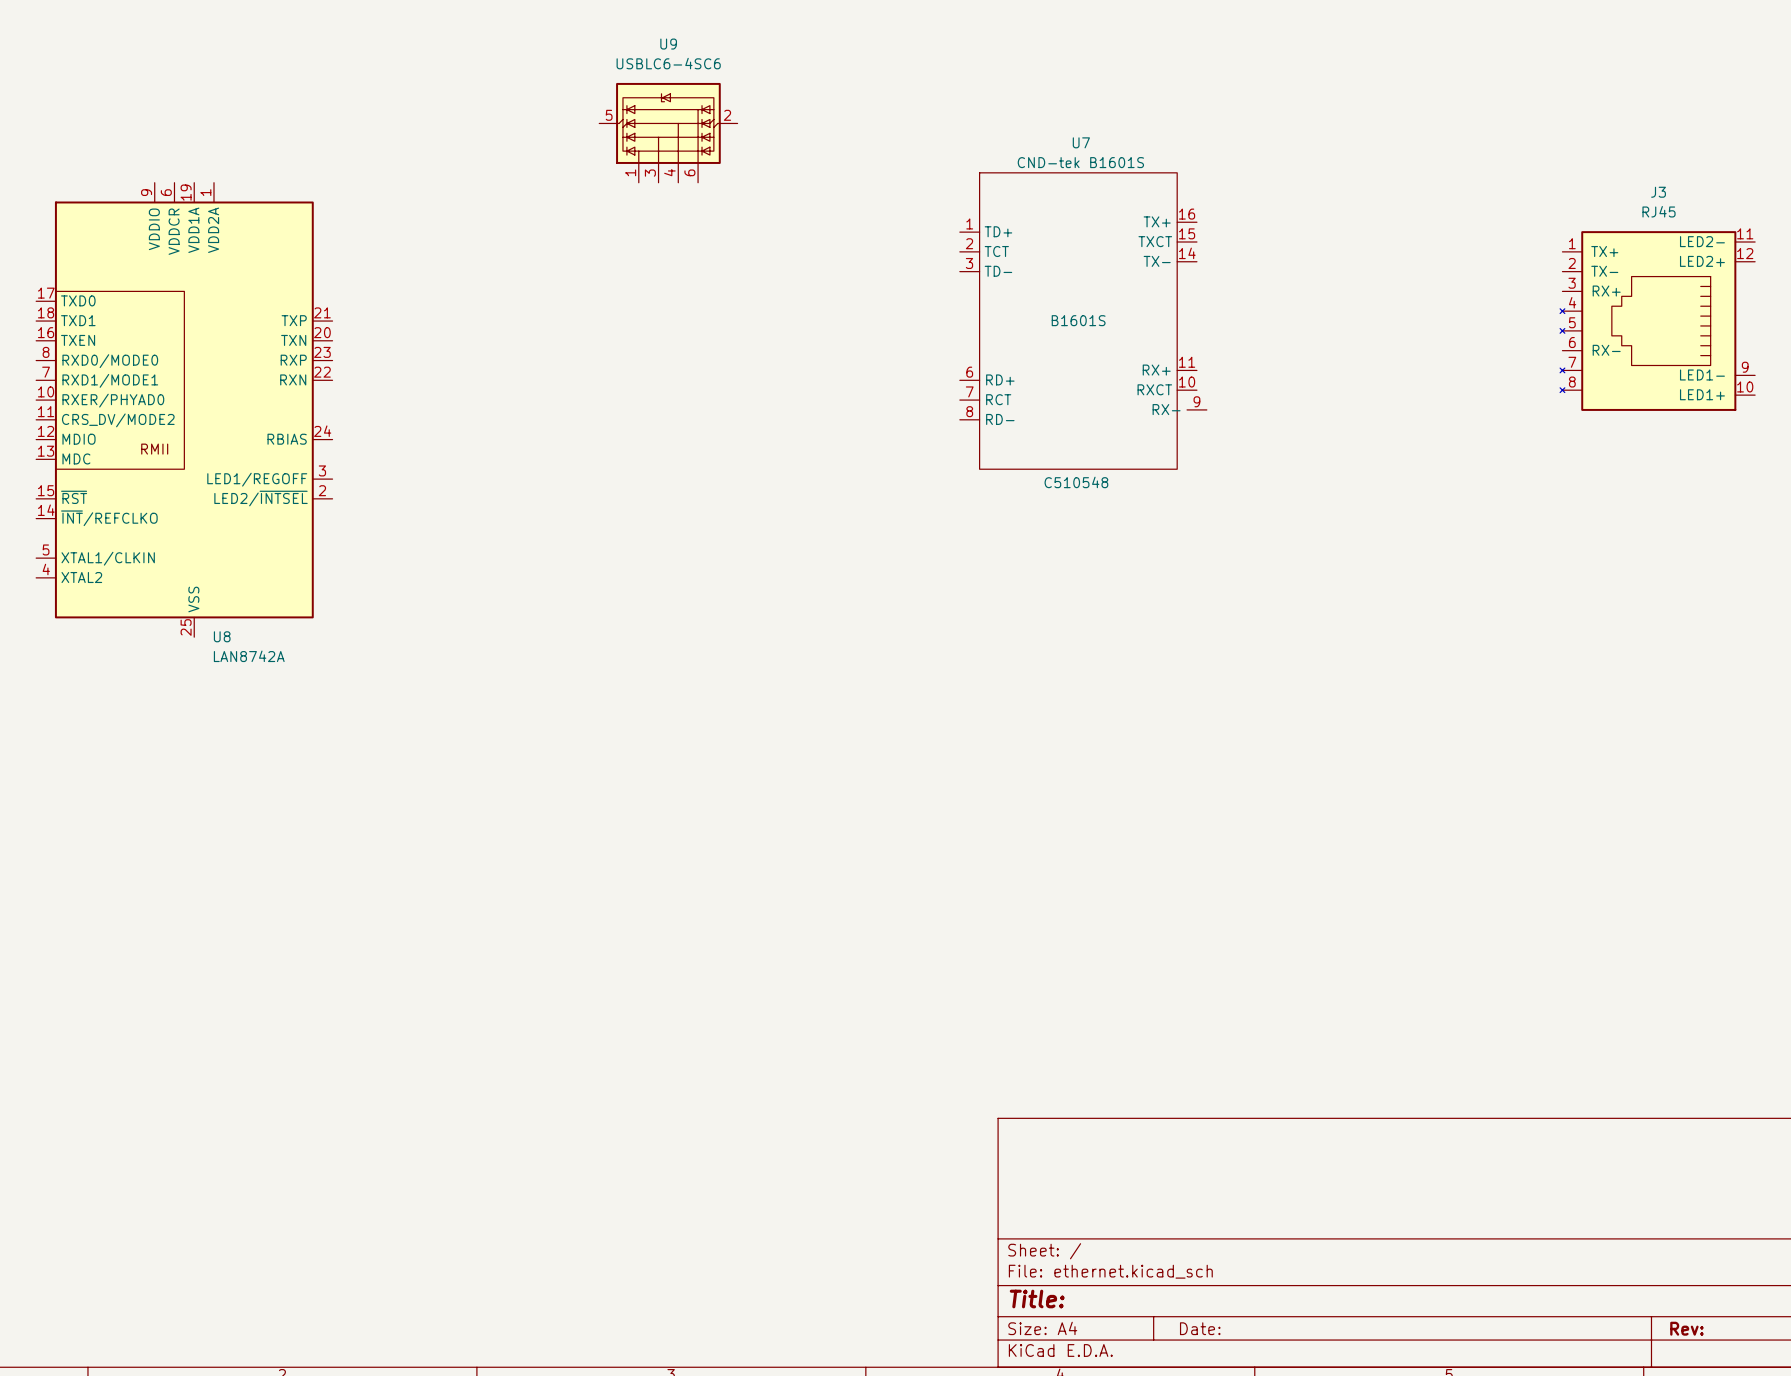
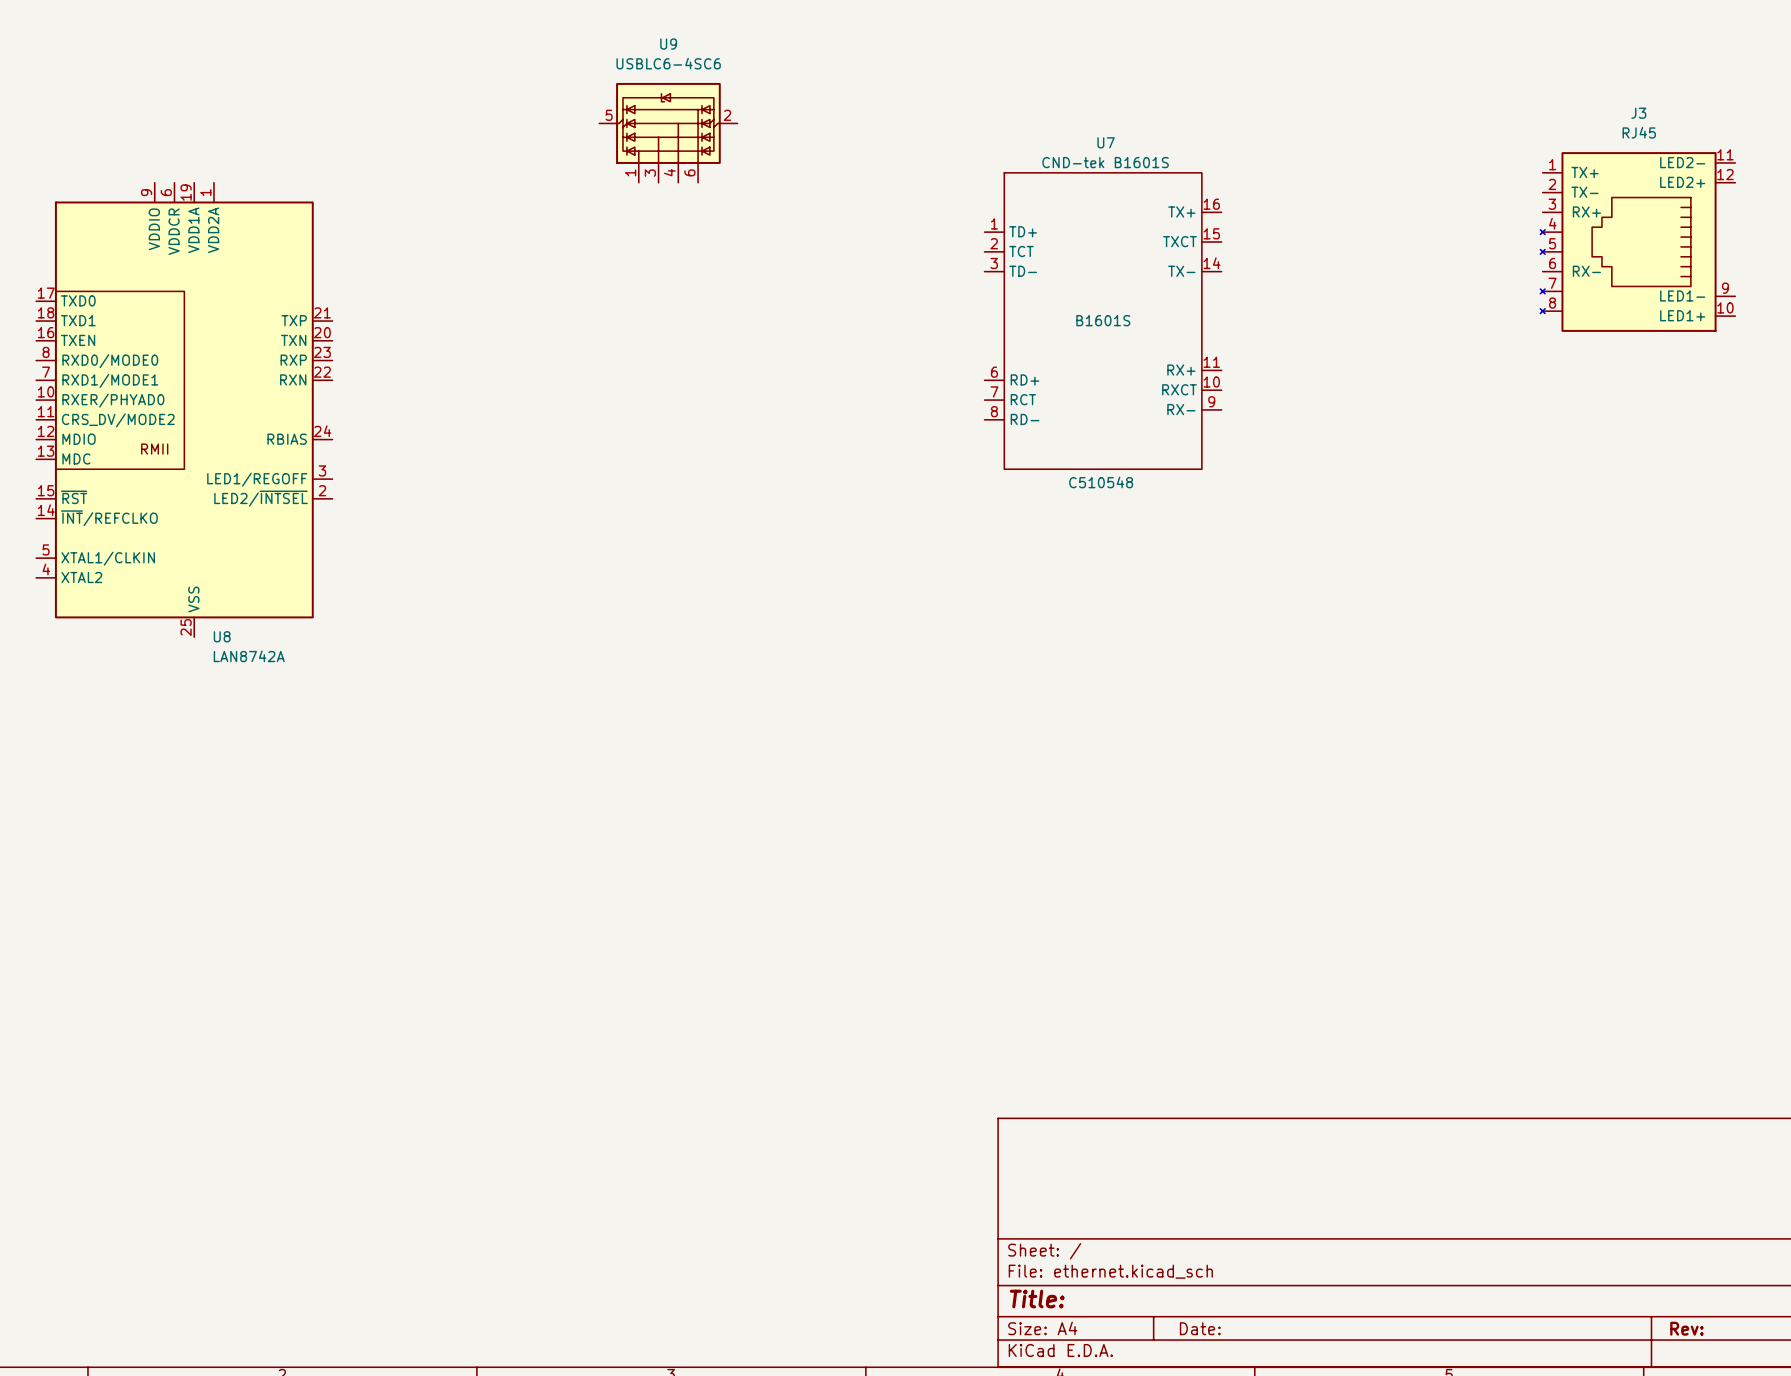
U7 symbol: [959, 172, 1207, 470] -> [984, 172, 1222, 470]
J3 position: (1657, 321) -> (1637, 242)

